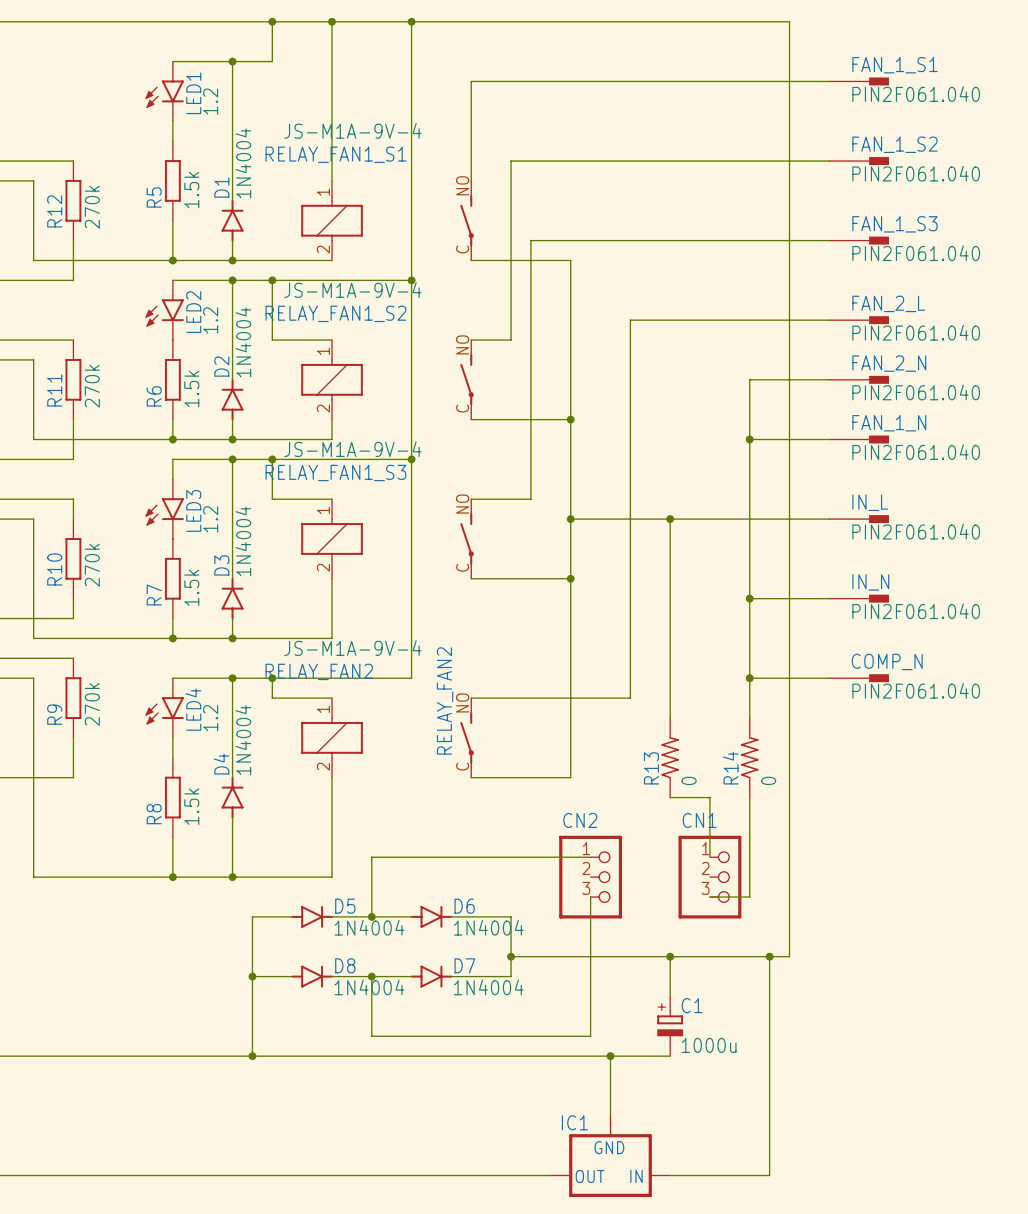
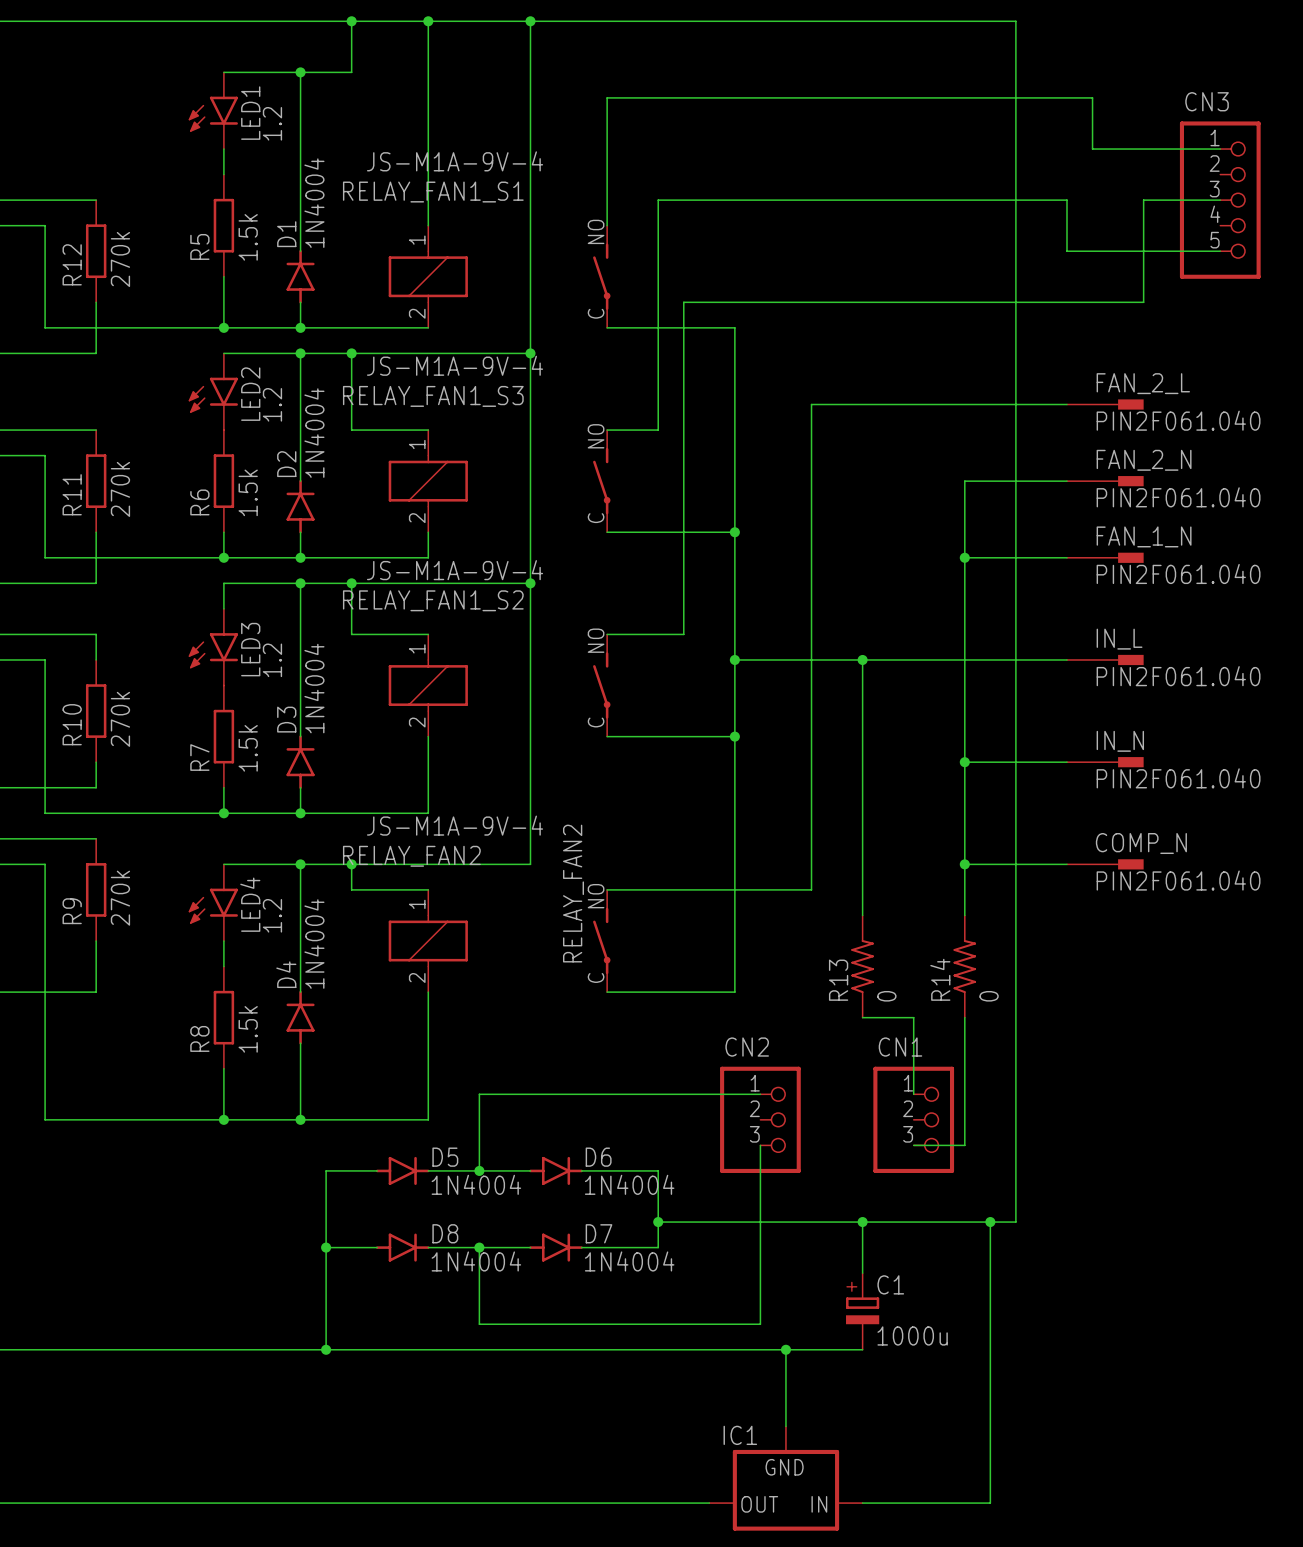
wire: none -> (1066, 97) (1092, 97) (1092, 149) (1220, 149)
FAN_1_S1: PIN2F061.040 (859, 81) -> none
wire: none -> (1066, 200) (1066, 251) (1220, 251)
FAN_1_S2: PIN2F061.040 (859, 161) -> none
wire: none -> (1220, 200) (1143, 200) (1143, 302) (1066, 302)
CN3: none -> (1220, 200)
FAN_1_S3: PIN2F061.040 (859, 240) -> none
RELAY_FAN1_S2 name: RELAY_FAN1_S2 (335, 313) -> RELAY_FAN1_S3 (433, 396)
RELAY_FAN1_S3 name: RELAY_FAN1_S3 (335, 473) -> RELAY_FAN1_S2 (433, 600)

